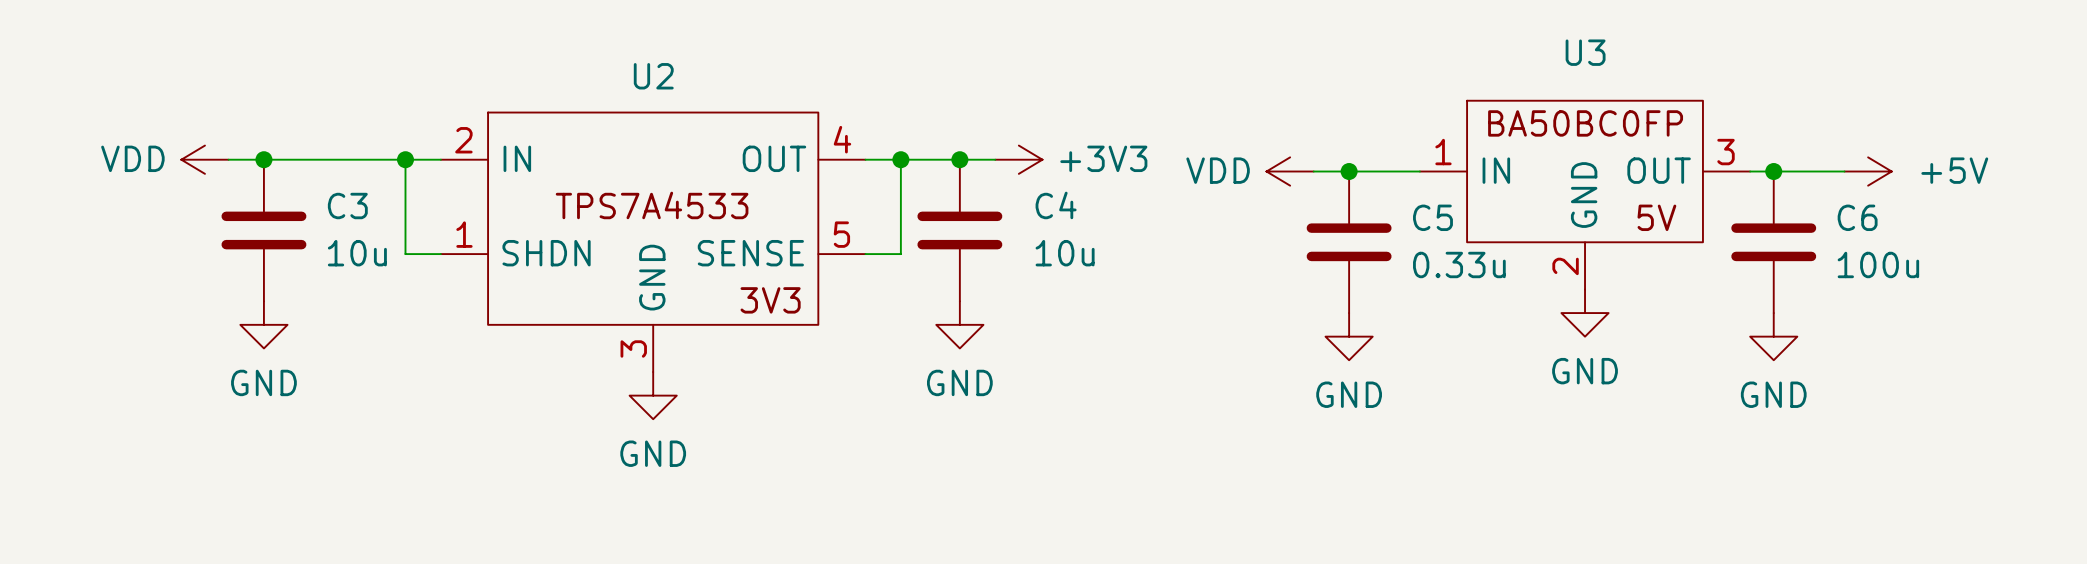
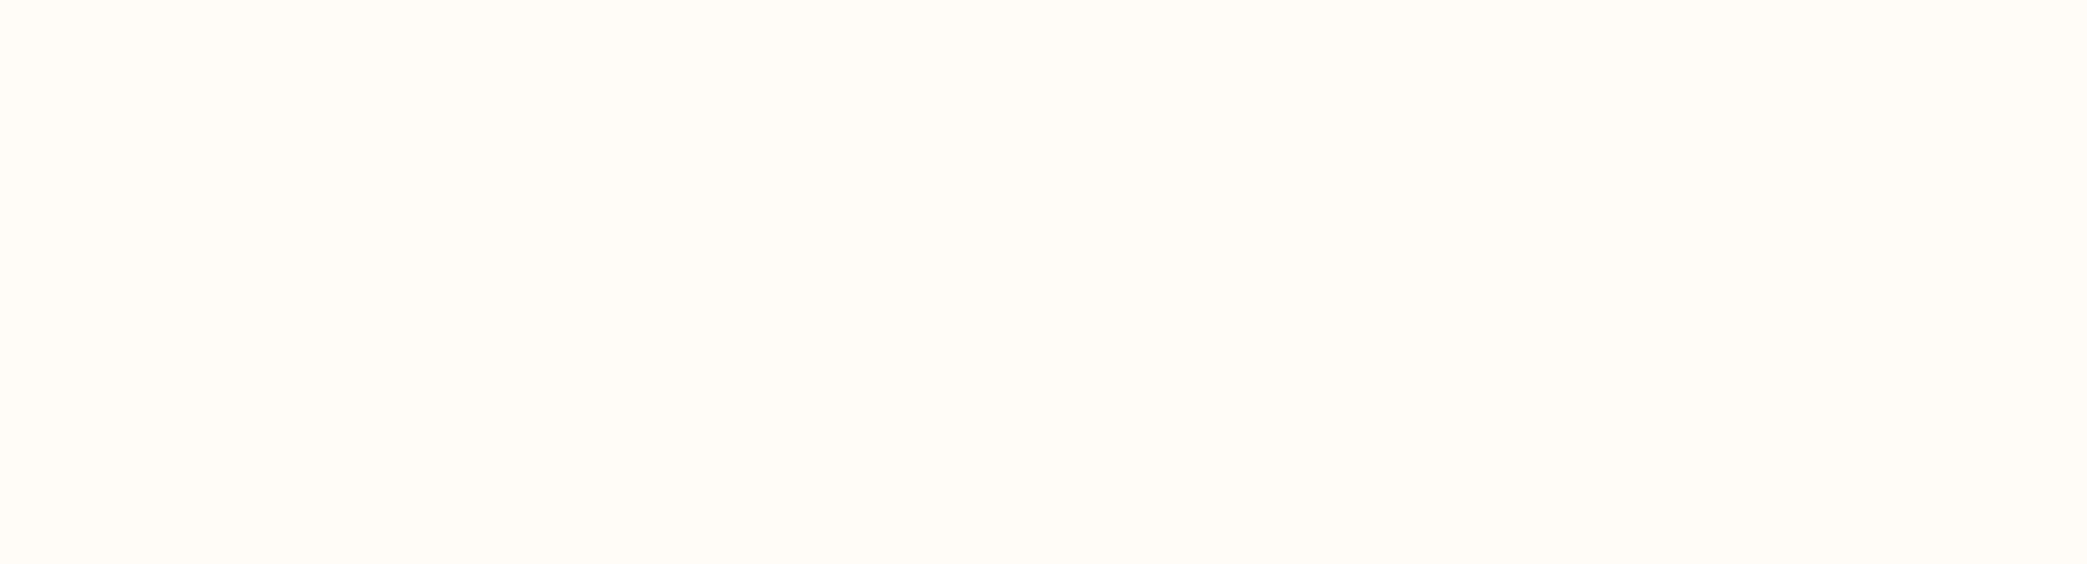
power symbol: VDD (204, 159) -> none
wire: (228, 159) (440, 159) -> none
junction: (263, 159) -> none
wire: (405, 159) (405, 254) (440, 254) -> none
junction: (405, 159) -> none
wire: (865, 159) (995, 159) -> none
wire: (900, 159) (900, 254) (865, 254) -> none
junction: (900, 159) -> none
junction: (959, 159) -> none
power symbol: +3V3 (1018, 159) -> none
power symbol: VDD (1290, 171) -> none
wire: (1313, 171) (1419, 171) -> none
junction: (1349, 171) -> none
wire: (1750, 171) (1844, 171) -> none
junction: (1773, 171) -> none
power symbol: +5V (1868, 171) -> none
U3: (1585, 195) -> none
C3: 10u (263, 230) -> none
C4: 10u (959, 230) -> none
U2: (653, 242) -> none
C5: 0.33u (1349, 242) -> none
C6: 100u (1773, 242) -> none
power symbol: GND (1585, 313) -> none
power symbol: GND (263, 324) -> none
power symbol: GND (959, 324) -> none
power symbol: GND (1349, 336) -> none
power symbol: GND (1773, 336) -> none
power symbol: GND (653, 395) -> none

